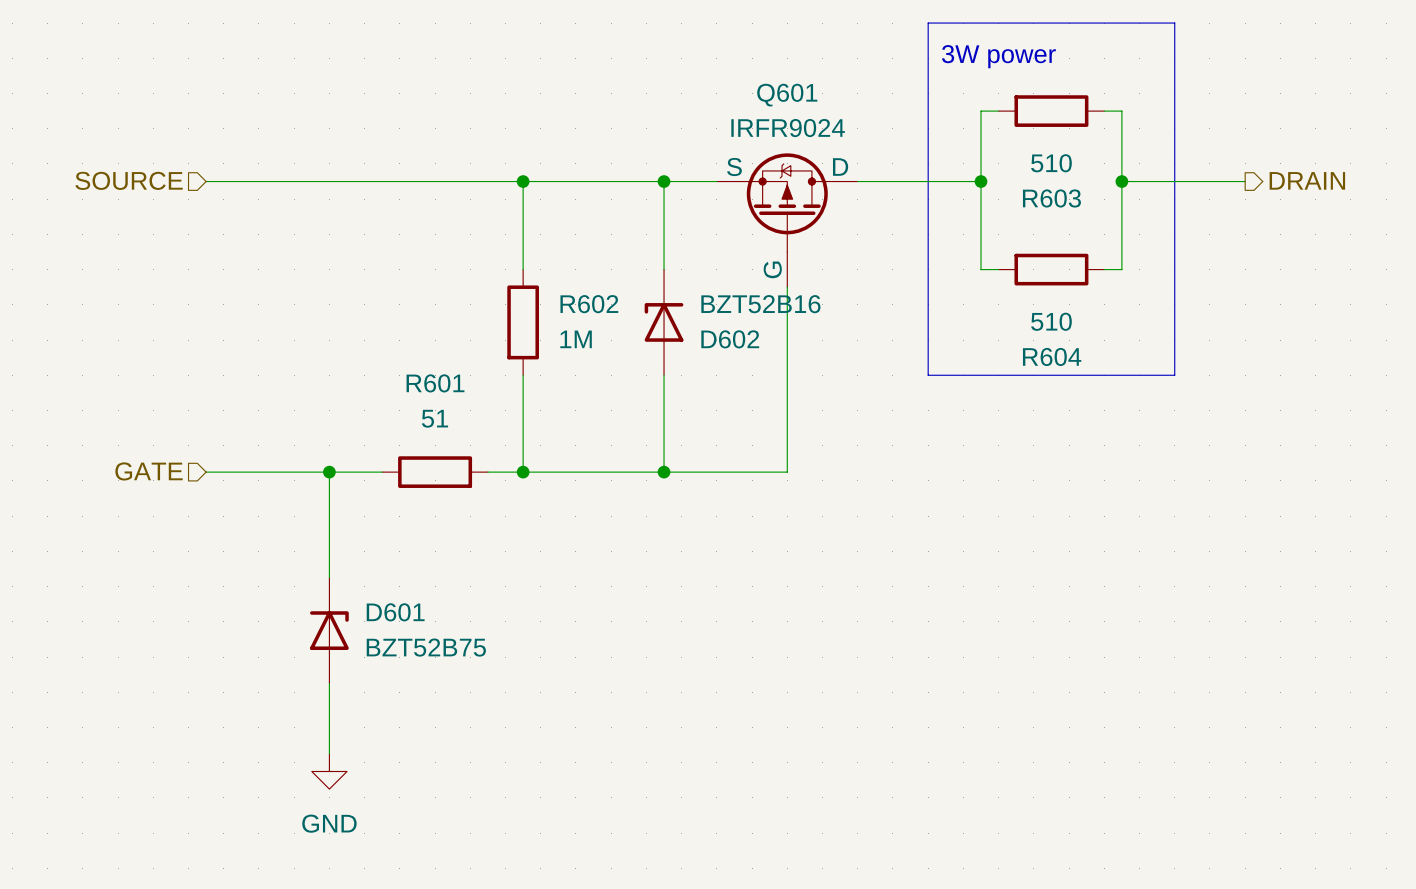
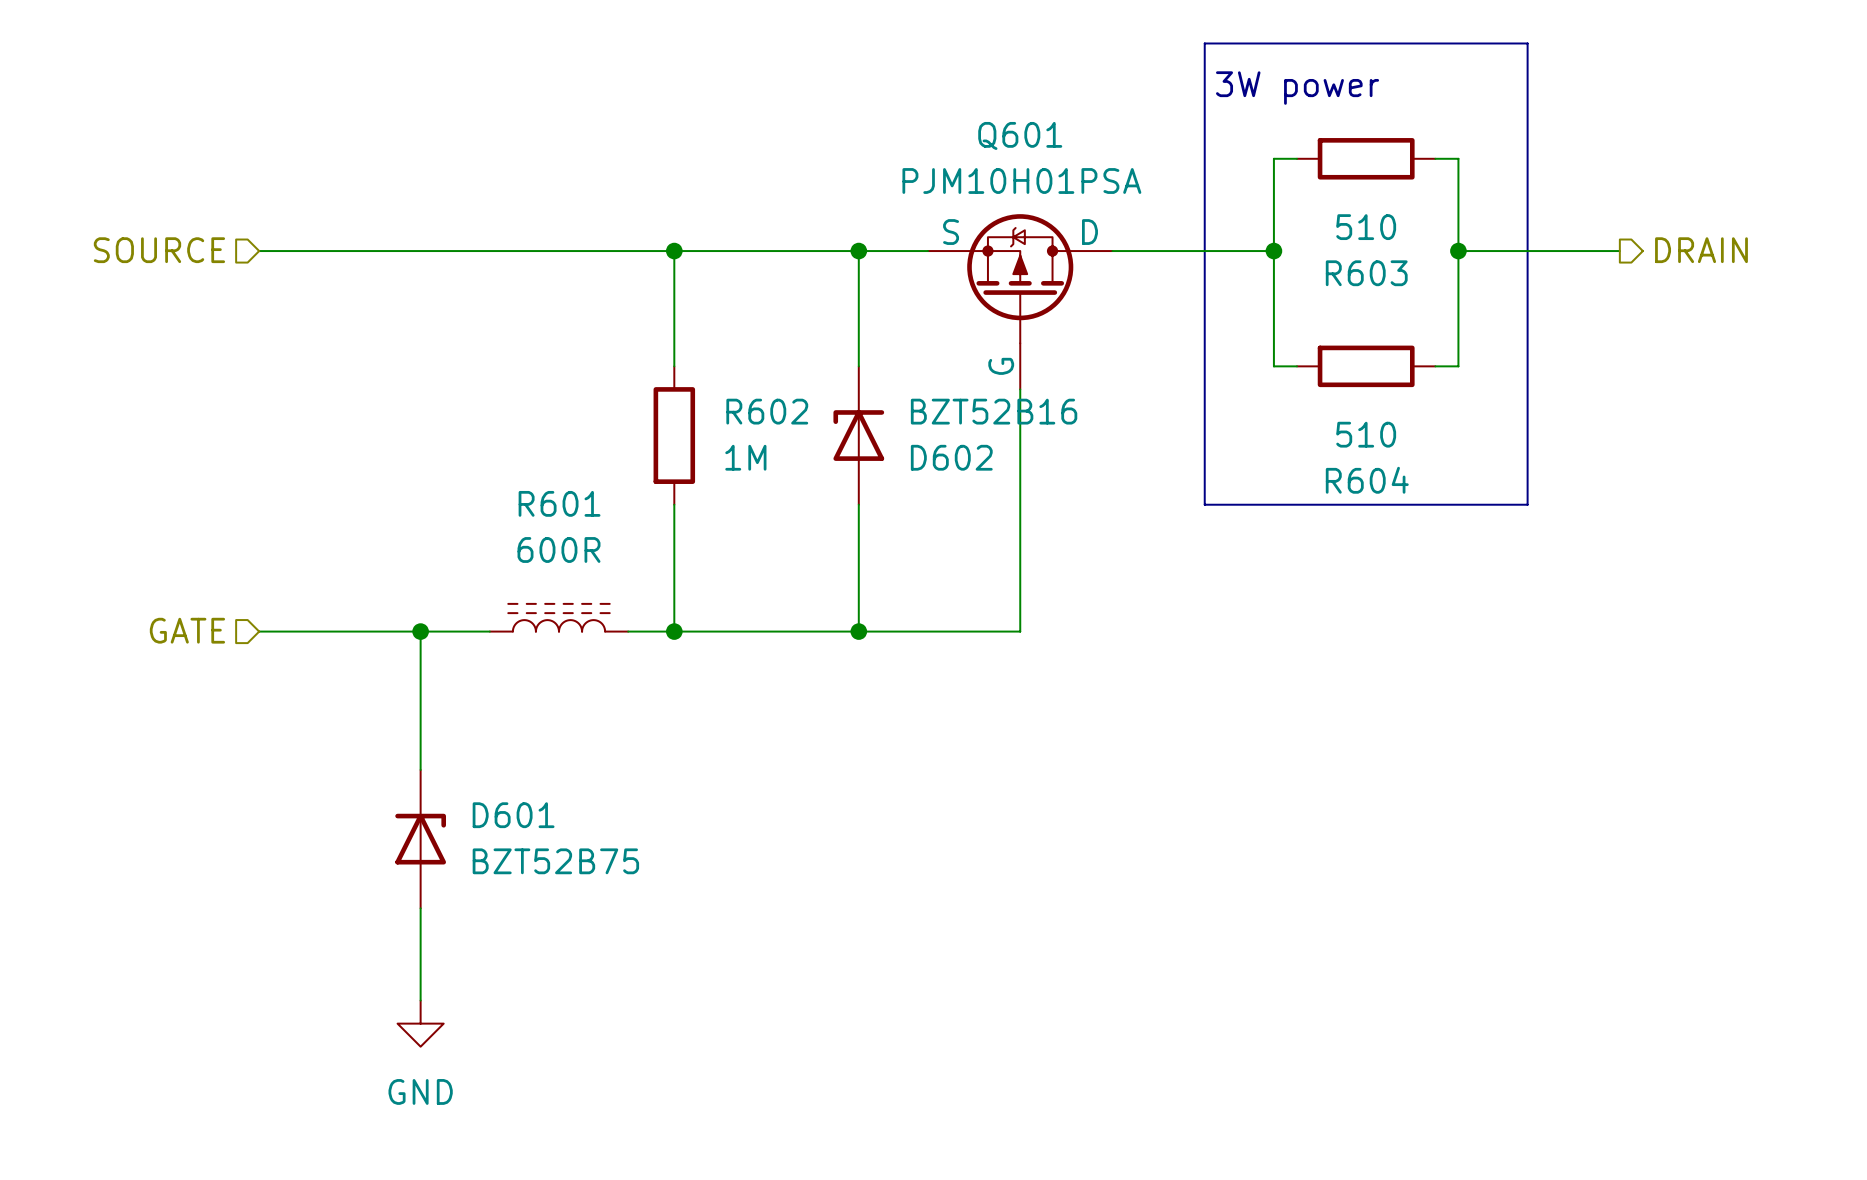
Q601 value: IRFR9024 (788, 128) -> PJM10H01PSA (1021, 180)
R601 value: 51 (434, 418) -> 600R (559, 549)
R601 symbol: [382, 456, 488, 488] -> [489, 603, 629, 632]

